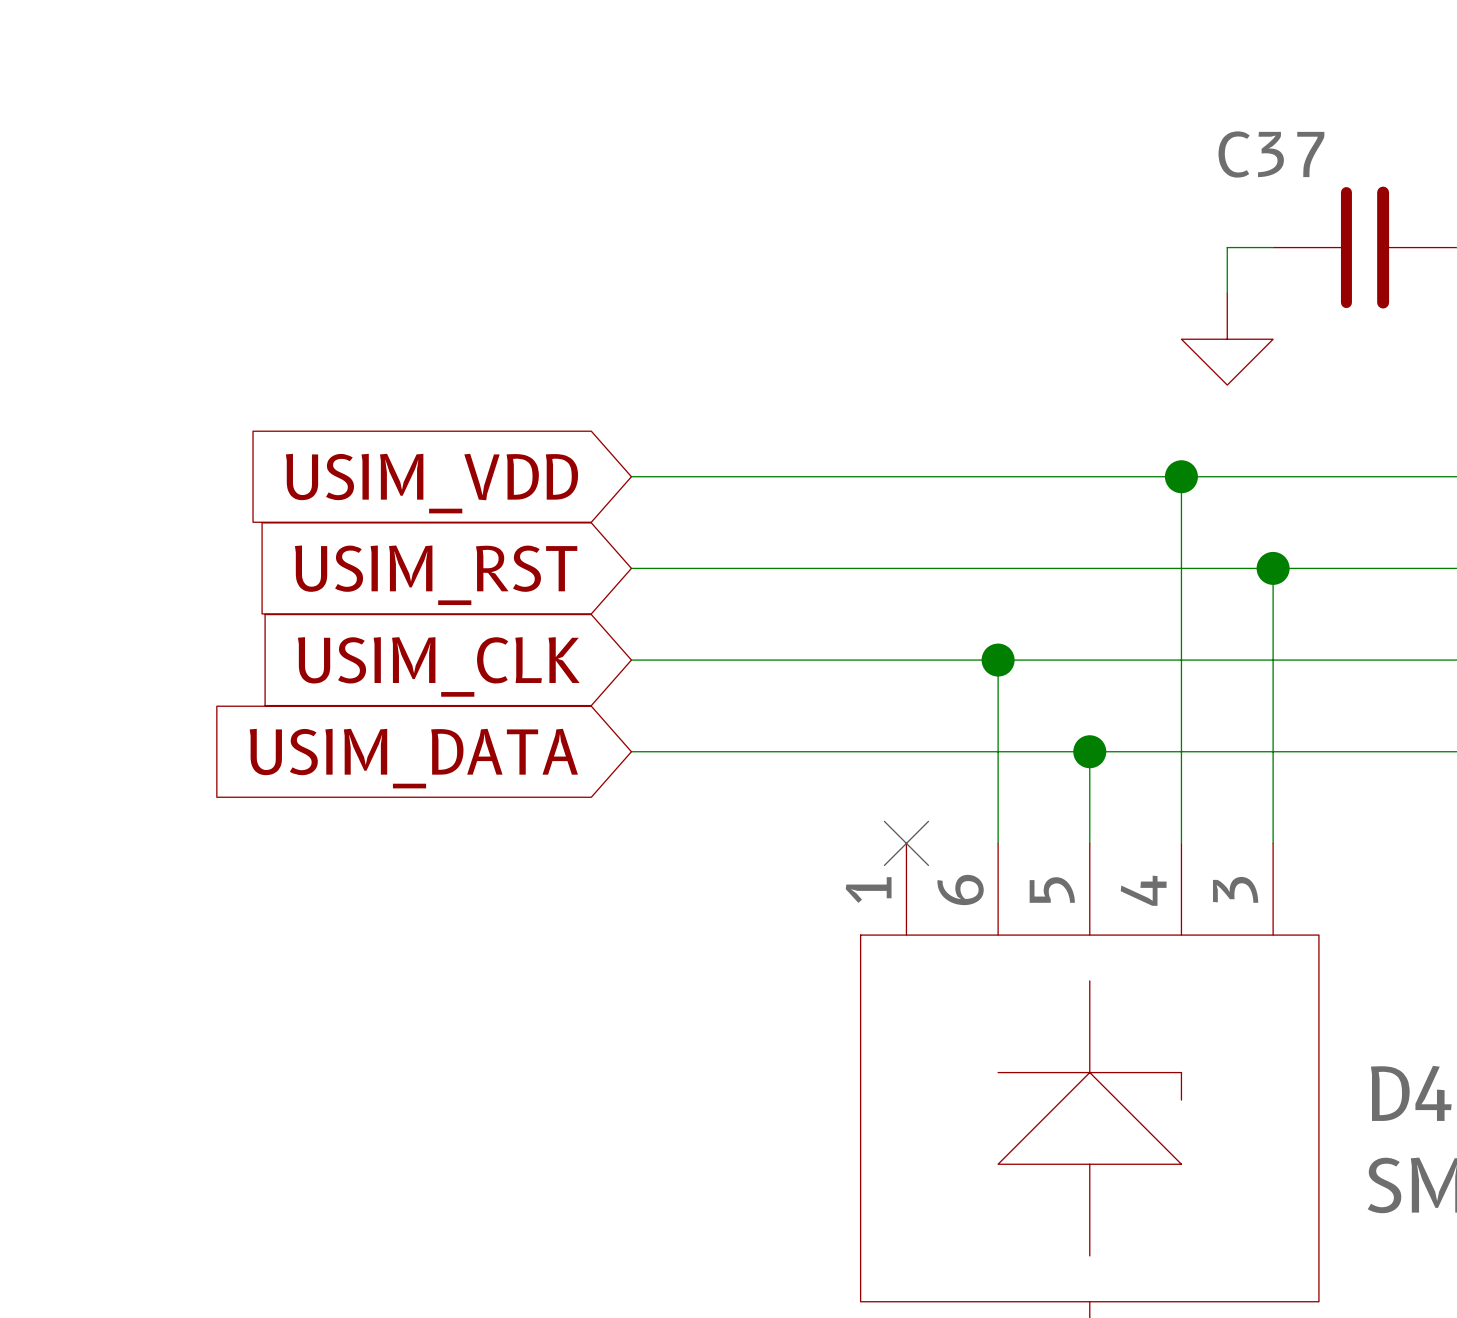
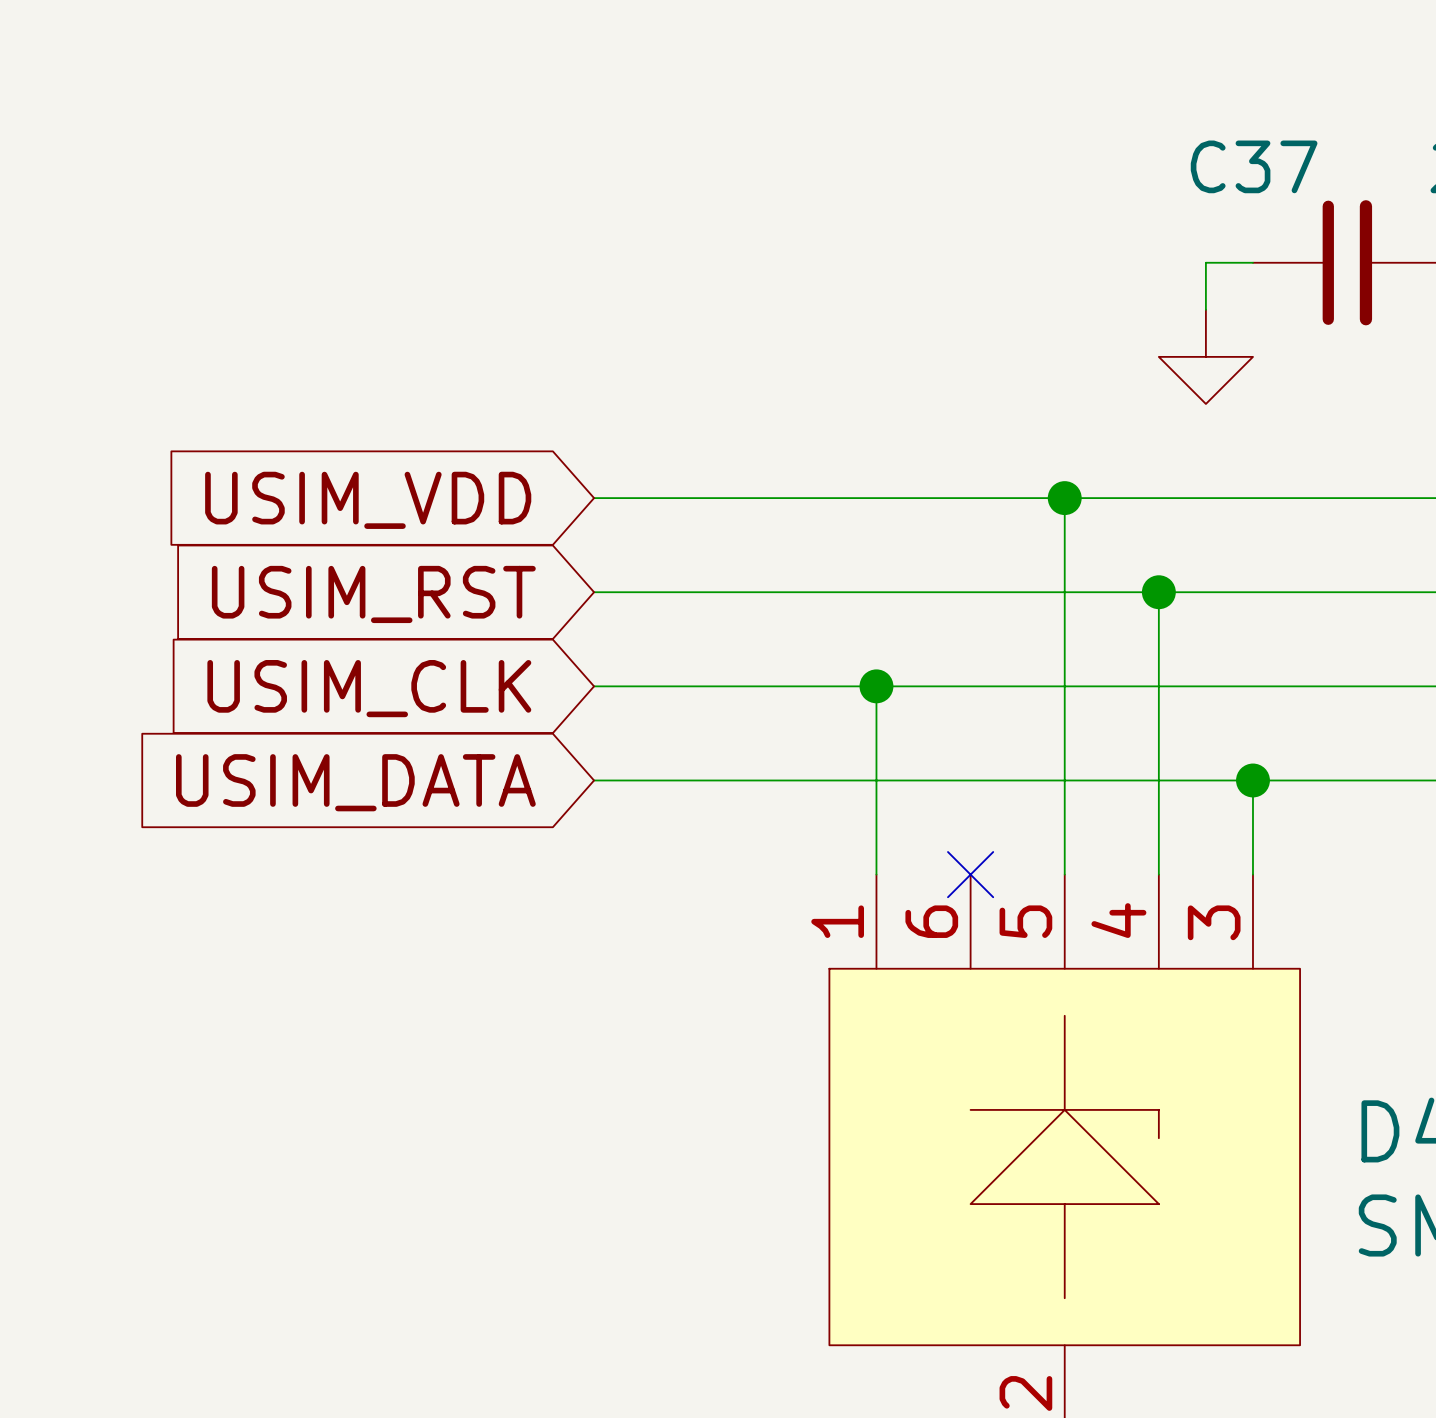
wire: none -> (1064, 498) (1064, 780)
junction: none -> (1064, 498)
wire: (1181, 476) (1181, 568) -> none
junction: (1181, 476) -> none
junction: none -> (1158, 592)
wire: (1273, 568) (1273, 751) -> none
junction: (1273, 568) -> none
wire: (998, 660) (998, 843) -> (876, 686) (876, 874)
junction position: (998, 660) -> (876, 686)
junction: (1089, 751) -> none
junction: none -> (1252, 780)
no-connect mark position: (906, 843) -> (970, 874)

